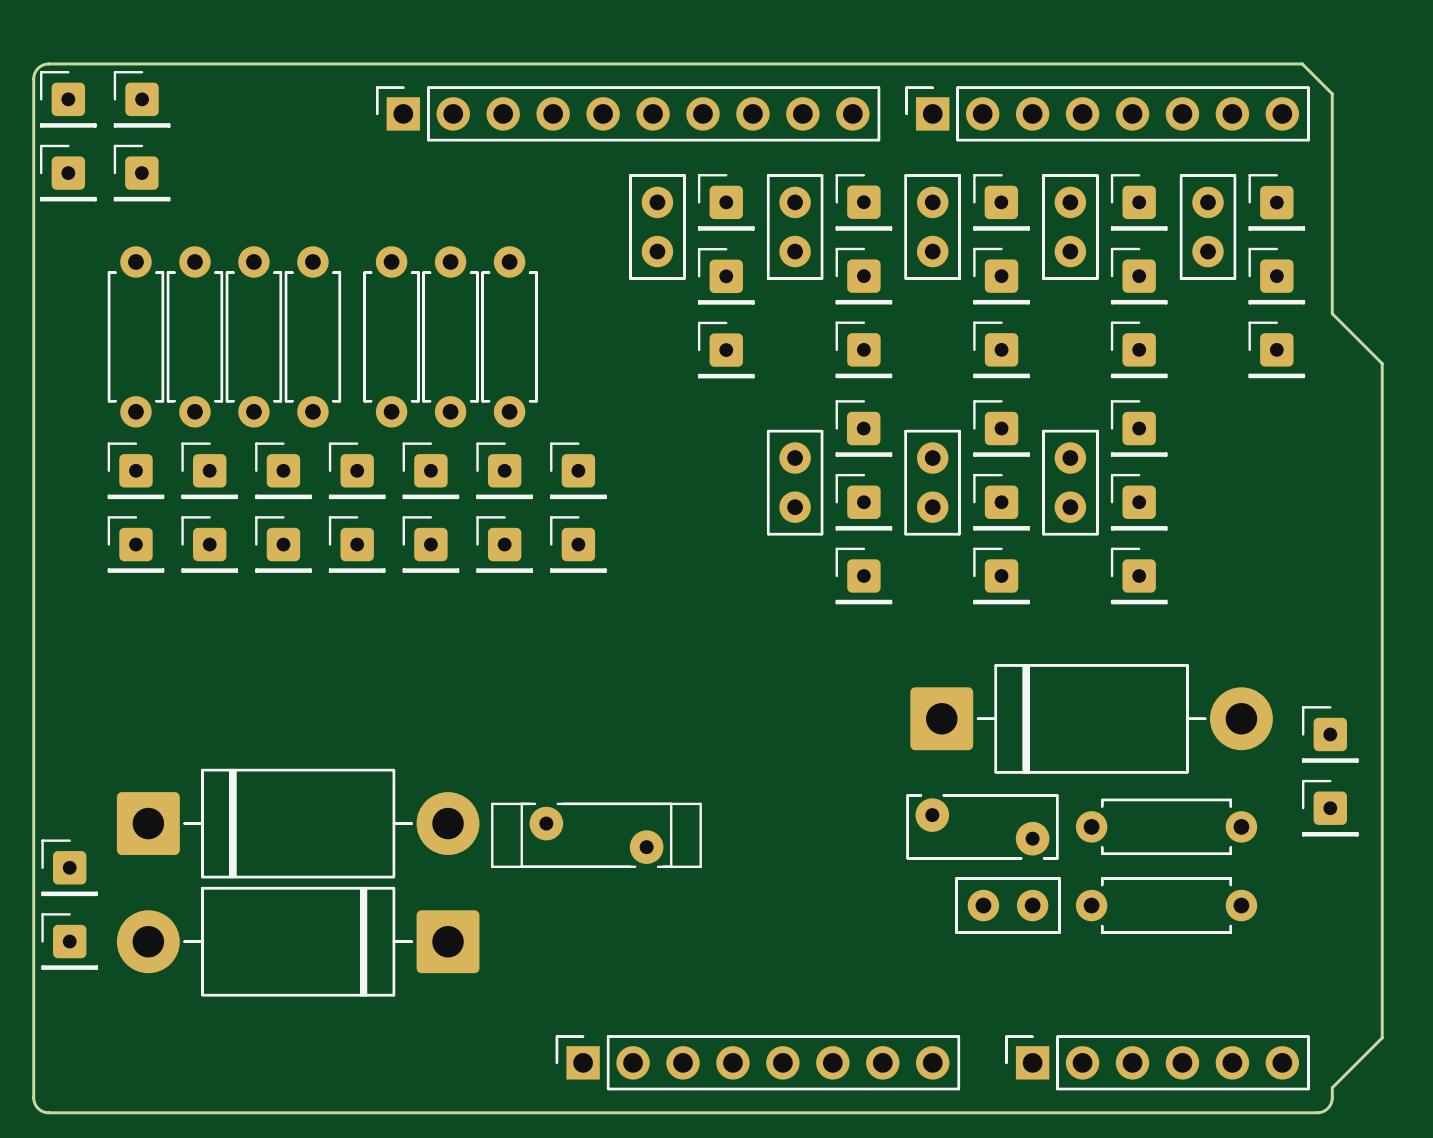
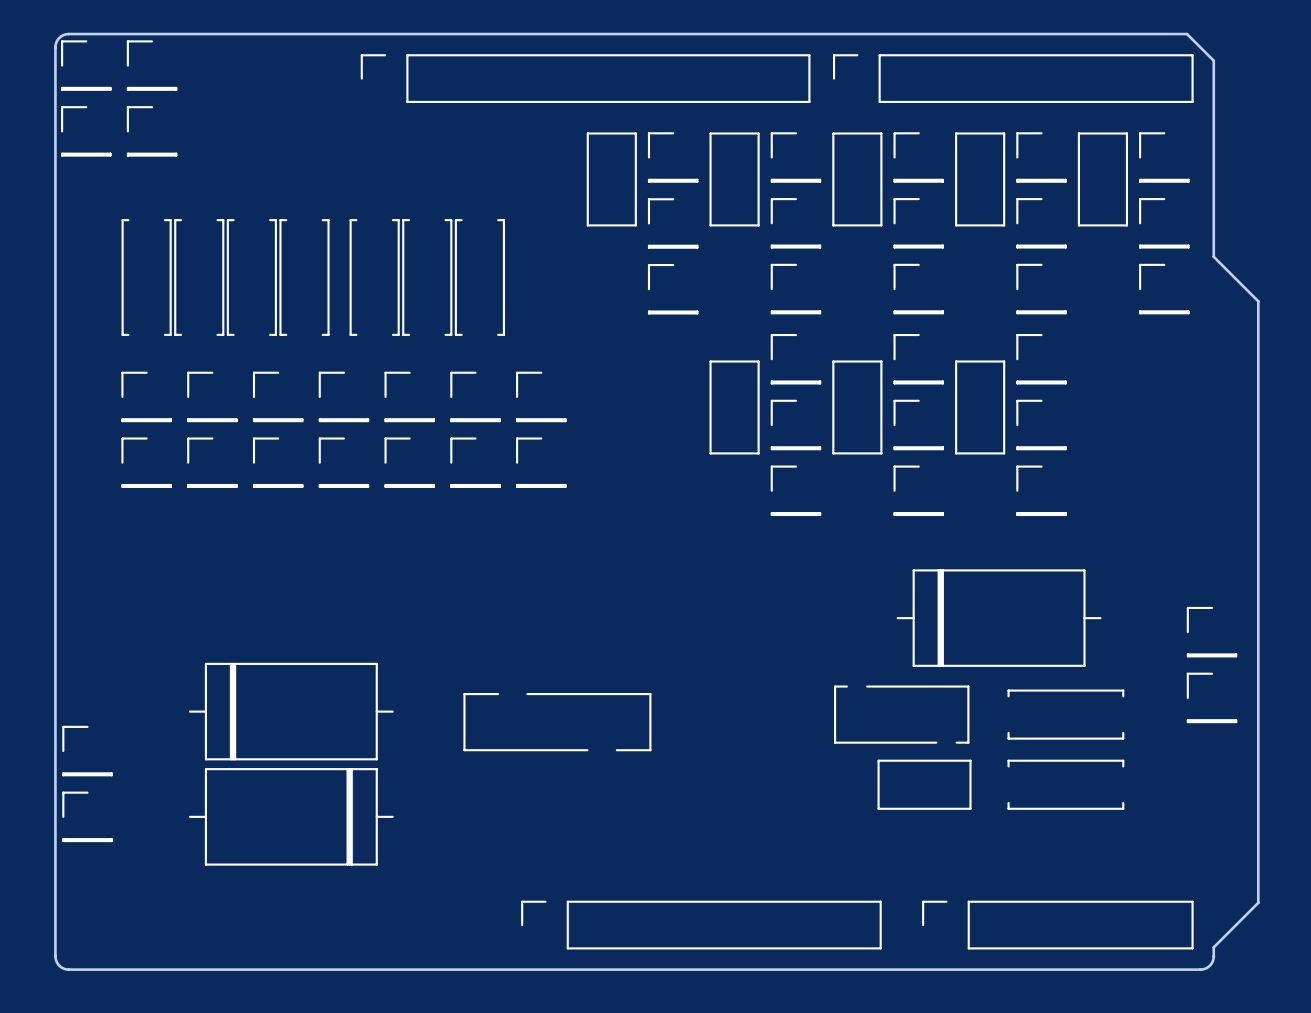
part: (68, 99) -> none
part: (142, 99) -> none
part: (628, 113) -> none
part: (1107, 113) -> none
part: (68, 173) -> none
part: (141, 173) -> none
part: (726, 202) -> none
part: (863, 202) -> none
part: (1001, 202) -> none
part: (1139, 202) -> none
part: (1276, 202) -> none
part: (657, 226) -> none
part: (795, 226) -> none
part: (932, 226) -> none
part: (1070, 226) -> none
part: (1208, 226) -> none
part: (726, 276) -> none
part: (863, 276) -> none
part: (1001, 276) -> none
part: (1139, 276) -> none
part: (1276, 276) -> none
part: (135, 336) -> none
part: (194, 336) -> none
part: (253, 336) -> none
part: (312, 336) -> none
part: (391, 336) -> none
part: (450, 336) -> none
part: (509, 336) -> none
part: (863, 349) -> none
part: (1001, 349) -> none
part: (1139, 349) -> none
part: (1276, 349) -> none
part: (726, 350) -> none
part: (863, 428) -> none
part: (1001, 428) -> none
part: (1139, 428) -> none
part: (135, 470) -> none
part: (209, 470) -> none
part: (283, 470) -> none
part: (357, 470) -> none
part: (430, 470) -> none
part: (504, 470) -> none
part: (578, 470) -> none
part: (795, 482) -> none
part: (932, 482) -> none
part: (1070, 482) -> none
part: (863, 502) -> none
part: (1001, 502) -> none
part: (1139, 502) -> none
part: (135, 544) -> none
part: (209, 544) -> none
part: (283, 544) -> none
part: (357, 544) -> none
part: (430, 544) -> none
part: (504, 544) -> none
part: (578, 544) -> none
part: (863, 575) -> none
part: (1001, 575) -> none
part: (1139, 575) -> none
part: (1091, 718) -> none
part: (1330, 734) -> none
part: (1330, 808) -> none
part: (298, 823) -> none
part: (982, 826) -> none
part: (1166, 826) -> none
part: (596, 835) -> none
part: (69, 867) -> none
part: (1008, 905) -> none
part: (1166, 905) -> none
part: (69, 941) -> none
part: (298, 941) -> none
part: (757, 1062) -> none
part: (1157, 1062) -> none

